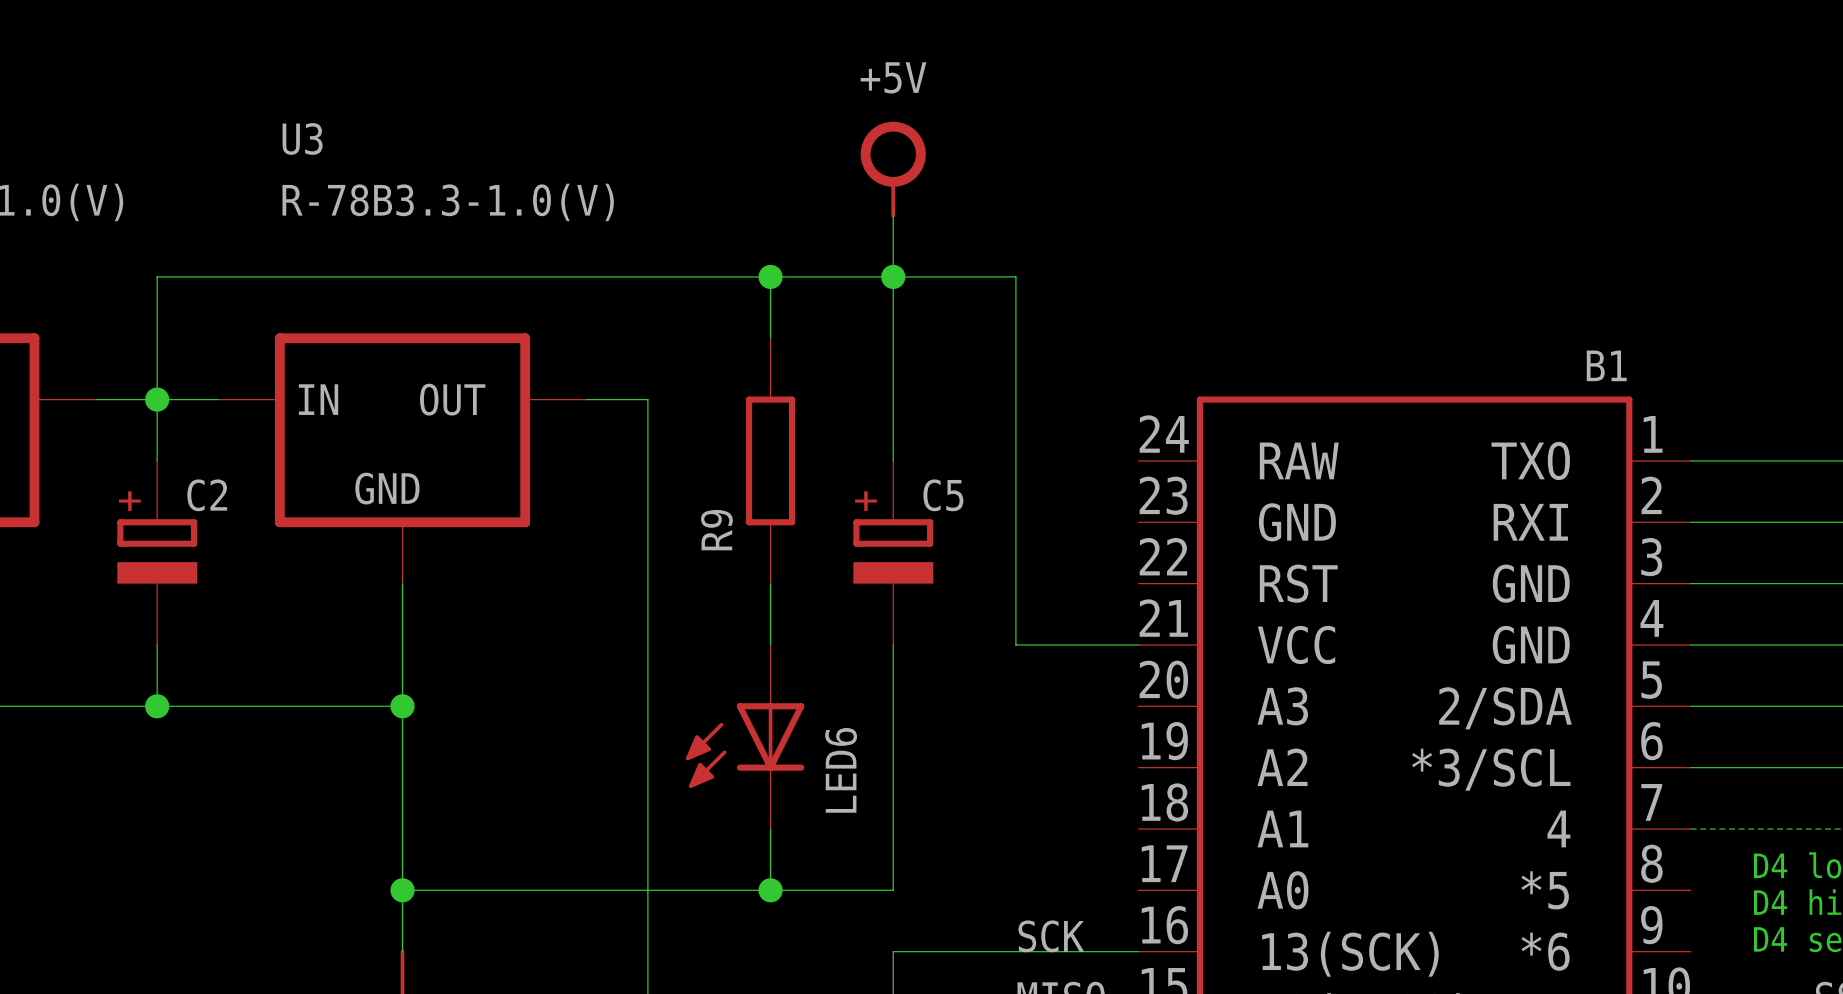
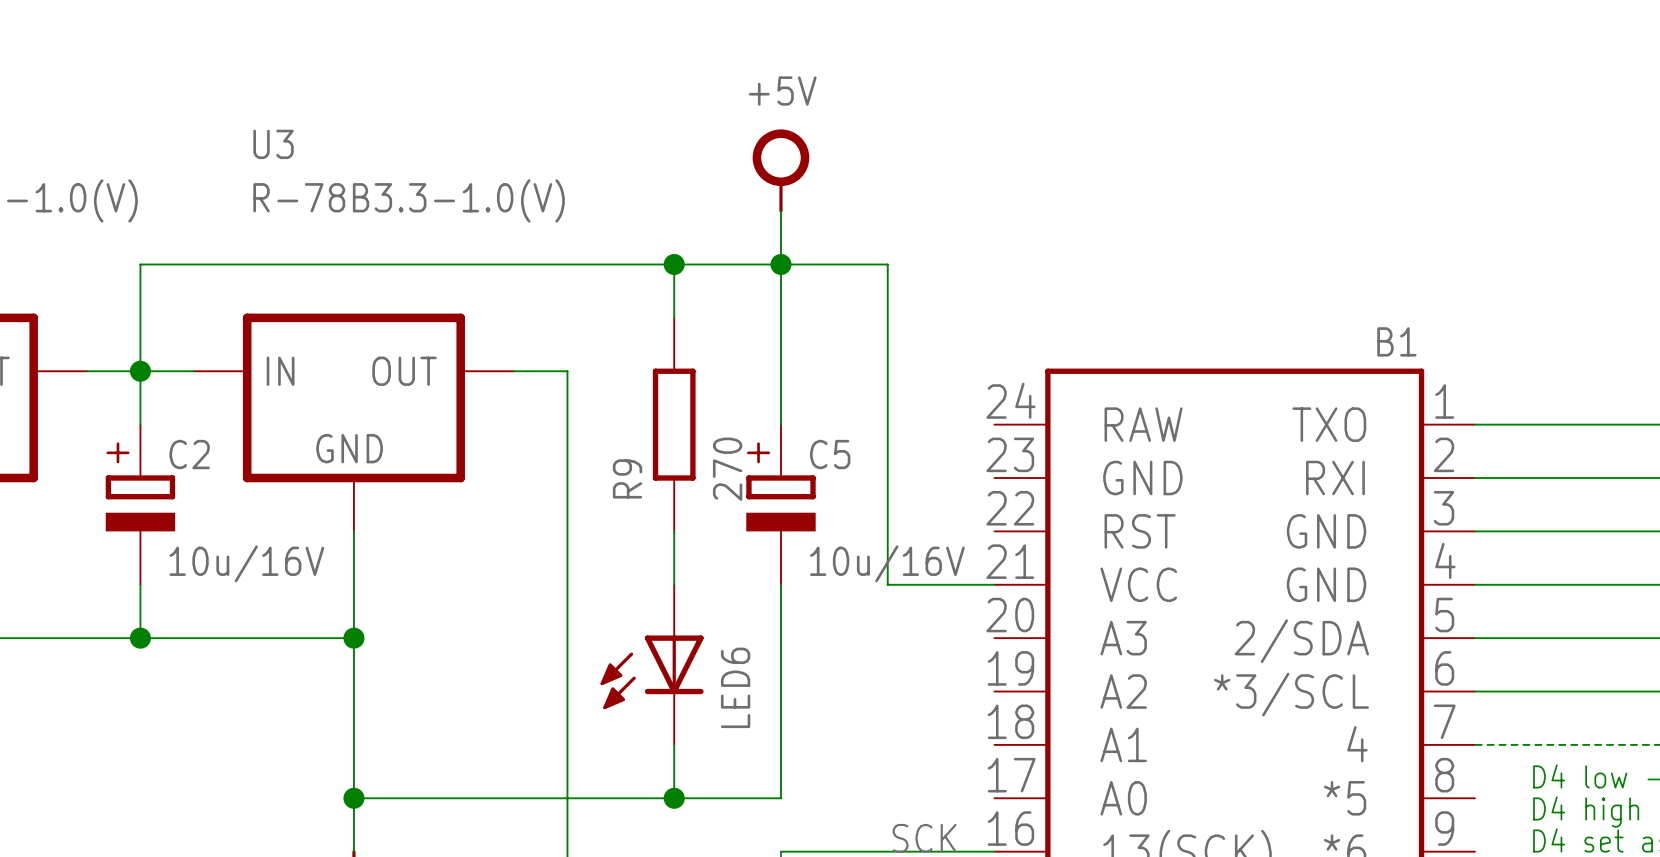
R9 value: none -> 270 (727, 469)
C2 value: none -> 10u/16V (246, 563)
C5 value: none -> 10u/16V (887, 563)

